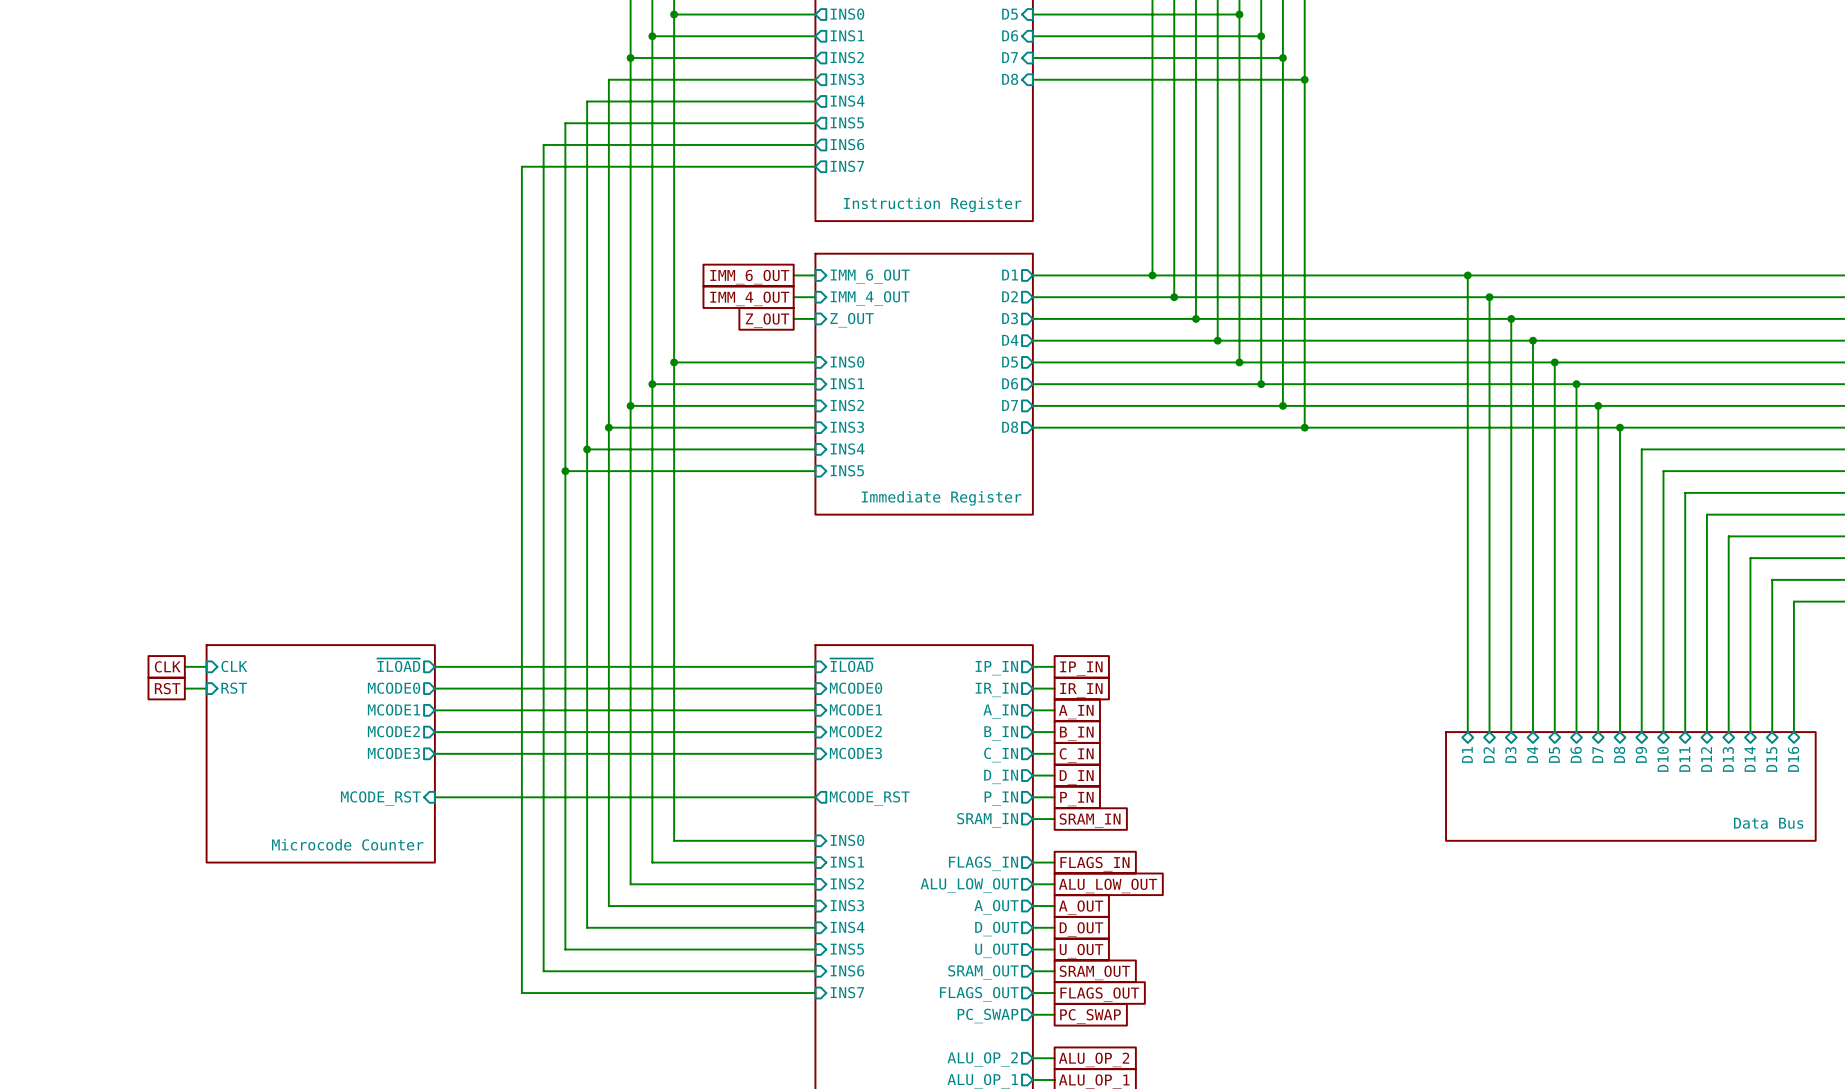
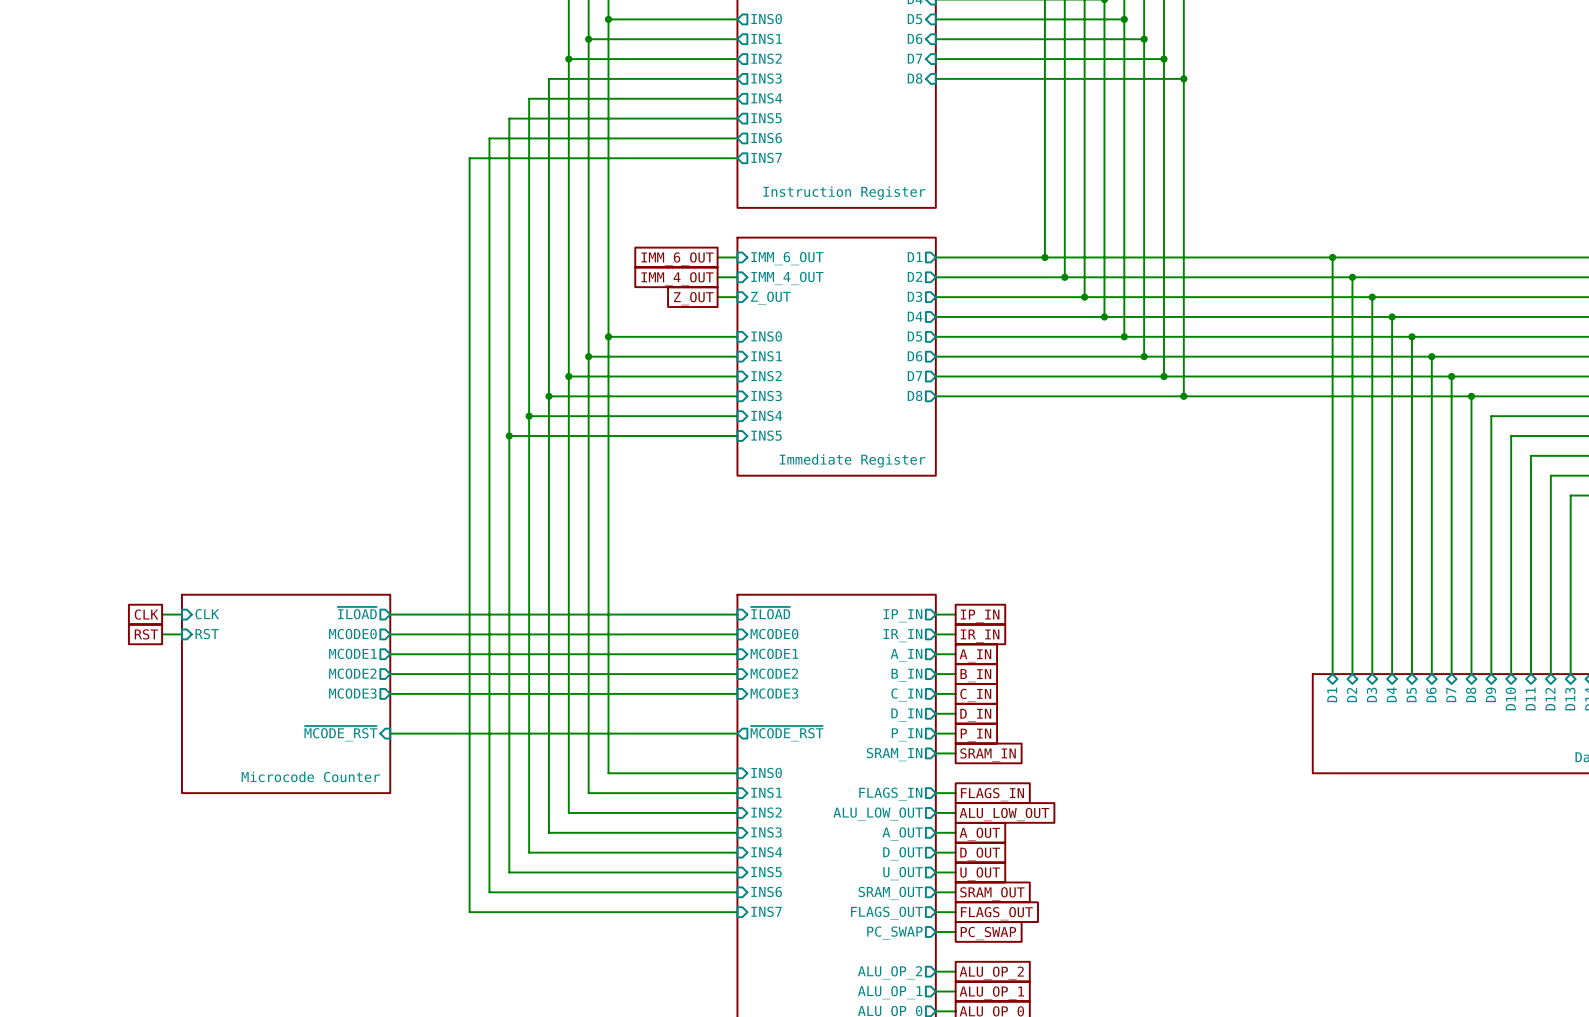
sheet pin: MCODE_RST (380, 798) -> ~{MCODE_RST} (340, 733)
sheet pin: MCODE_RST (869, 798) -> ~{MCODE_RST} (787, 733)

